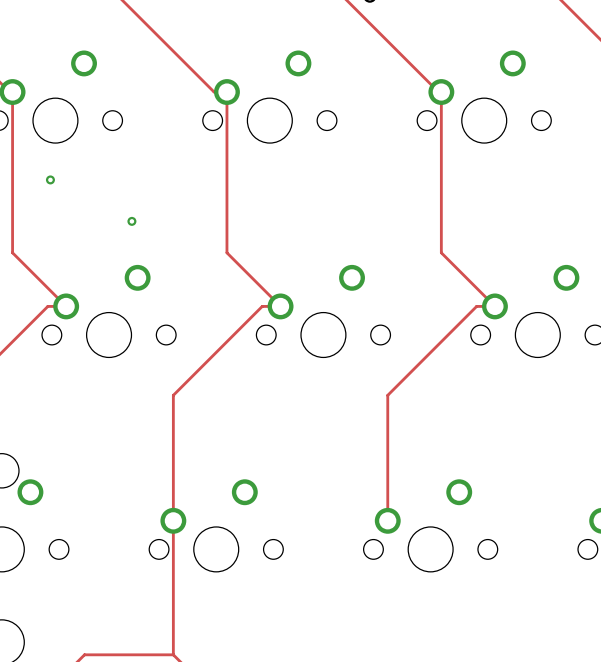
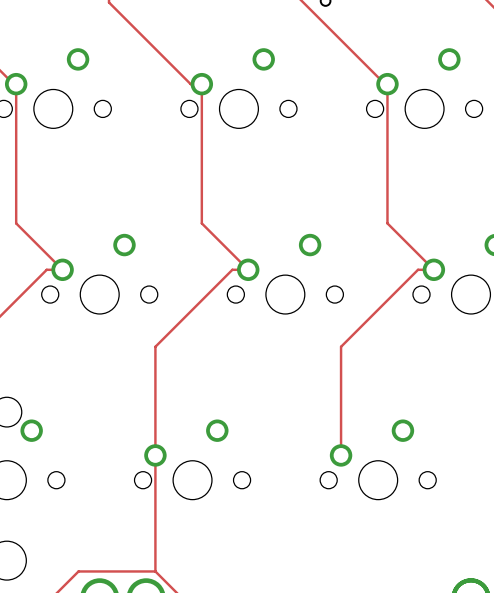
via: (50, 179) -> none
via: (131, 221) -> none

